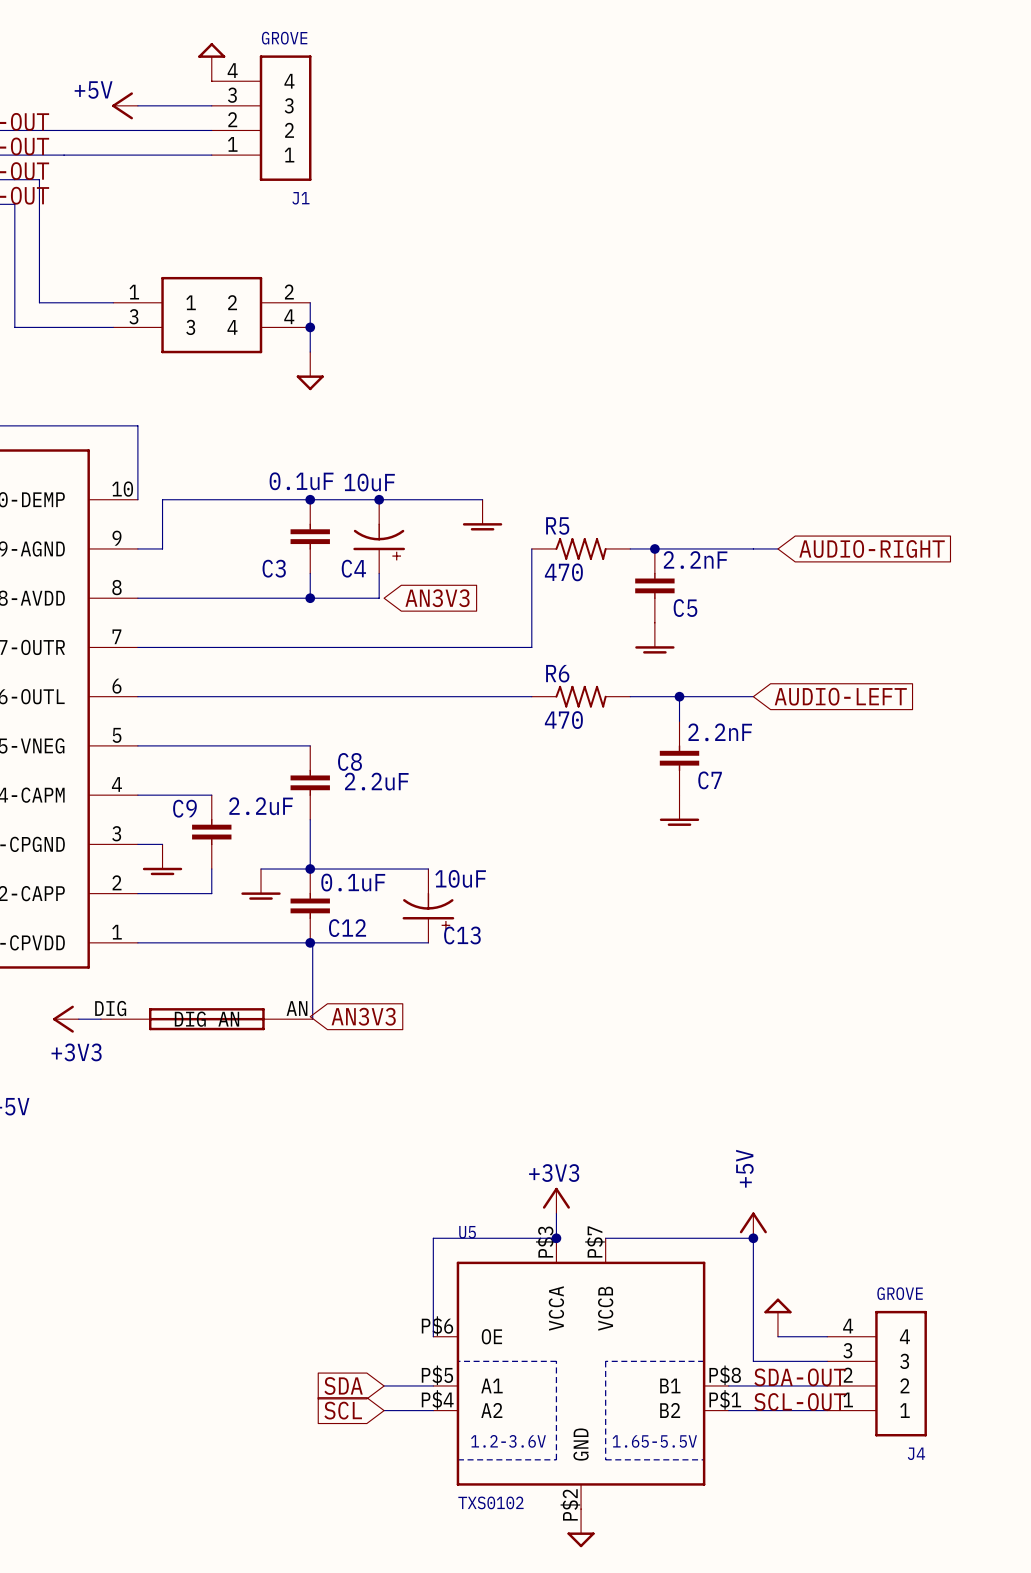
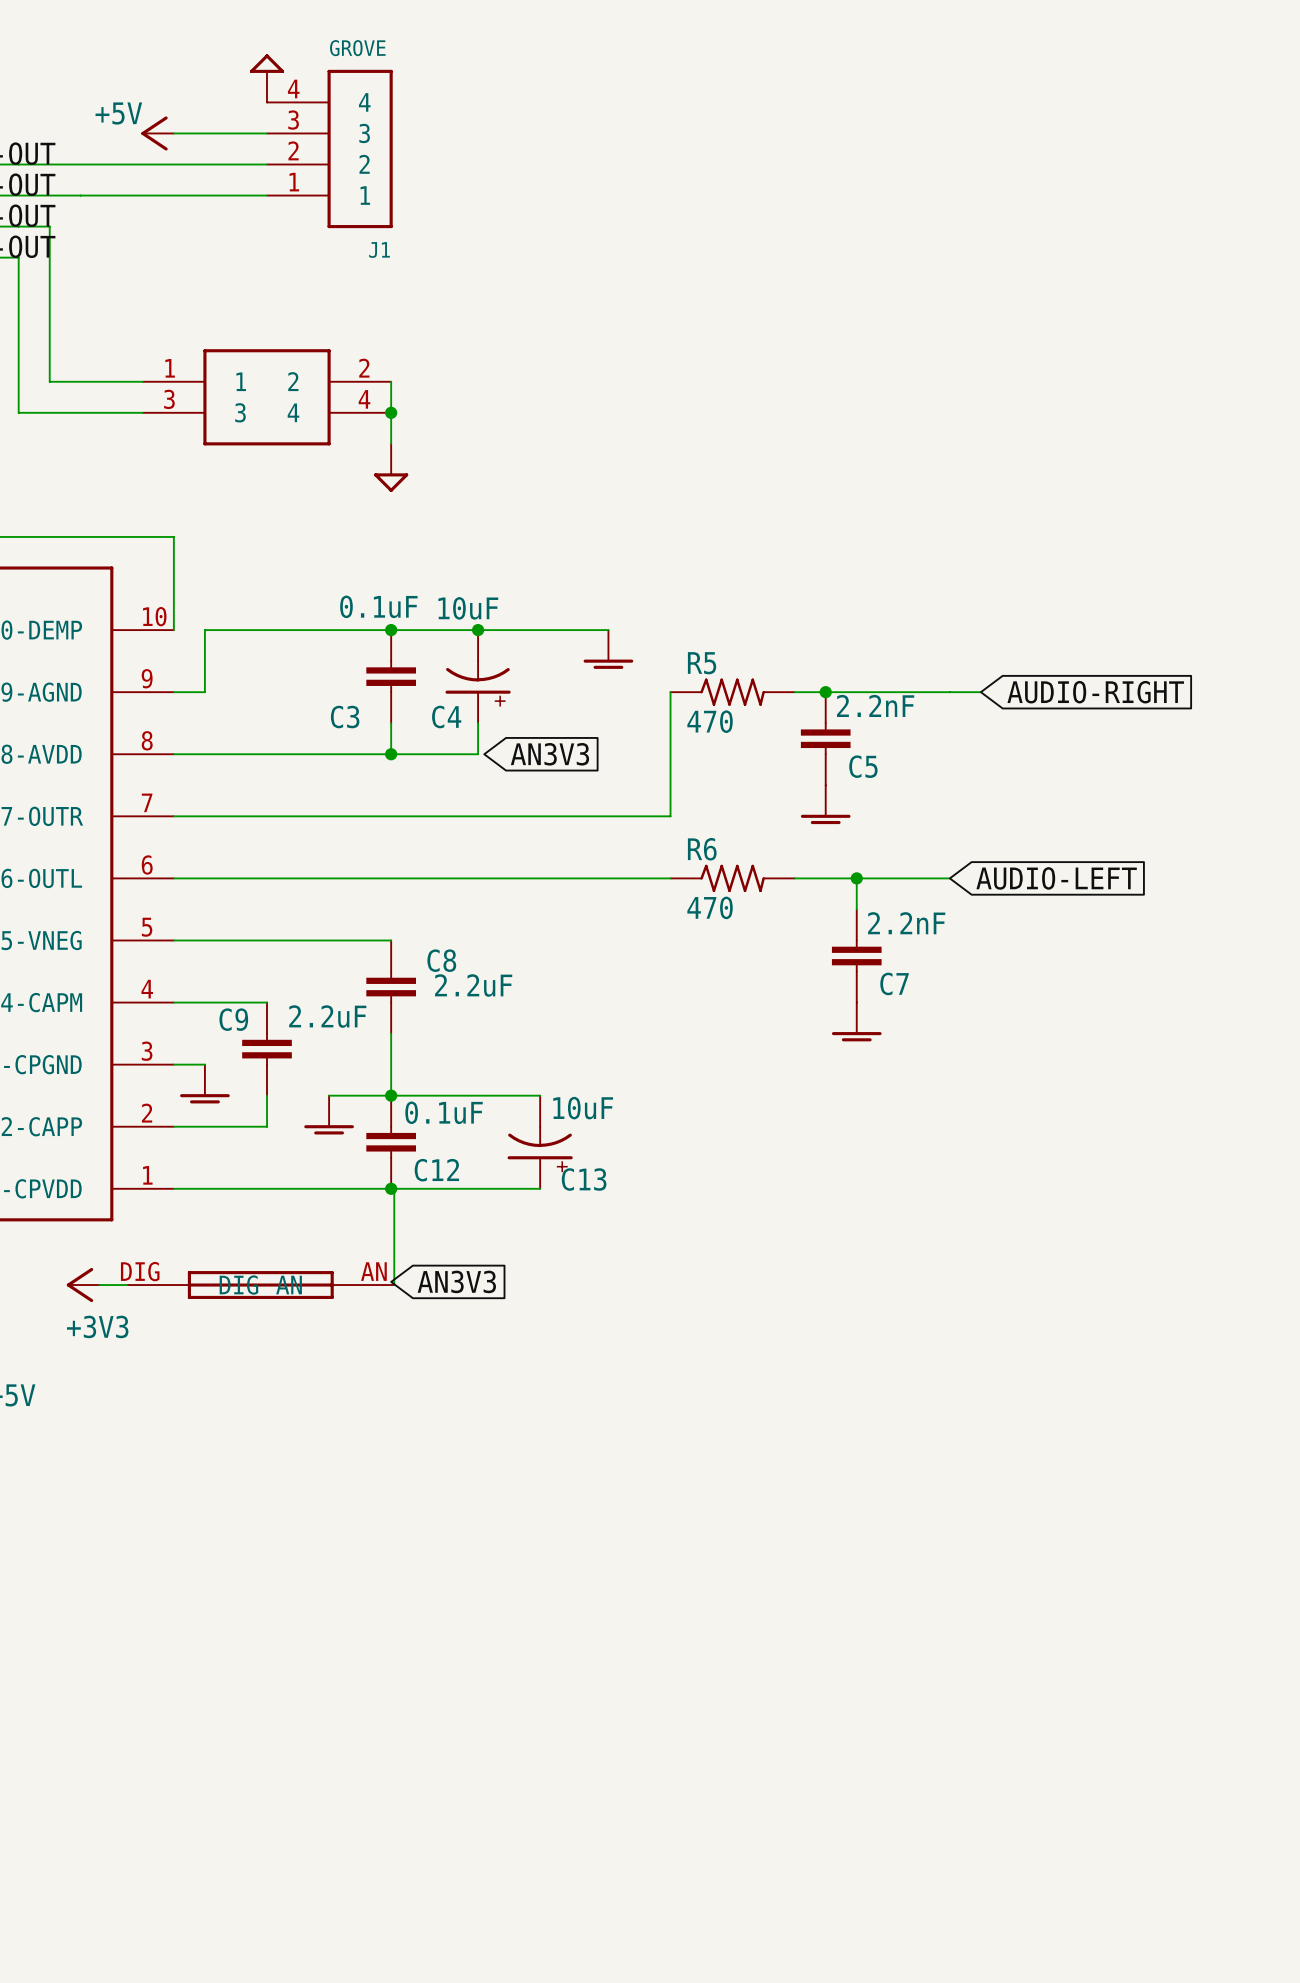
power symbol: +3V3 (556, 1200) -> none
wire: (556, 1213) (556, 1238) (433, 1238) (433, 1336) -> none
power symbol: +5V (753, 1225) -> none
junction: (556, 1238) -> none
wire: (605, 1238) (753, 1238) (753, 1361) (827, 1361) -> none
junction: (753, 1238) -> none
power symbol: (777, 1317) -> none
wire: (777, 1336) (827, 1336) -> none
U5: TXS0102 (581, 1373) -> none
J4: GROVE (877, 1373) -> none
label: SDA-OUT (800, 1377) -> none
global label: SDA (343, 1385) -> none
wire: (384, 1385) (433, 1385) -> none
wire: (728, 1385) (827, 1385) -> none
label: SCL-OUT (800, 1401) -> none
global label: SCL (343, 1410) -> none
wire: (384, 1410) (433, 1410) -> none
wire: (728, 1410) (827, 1410) -> none
power symbol: (581, 1528) -> none

